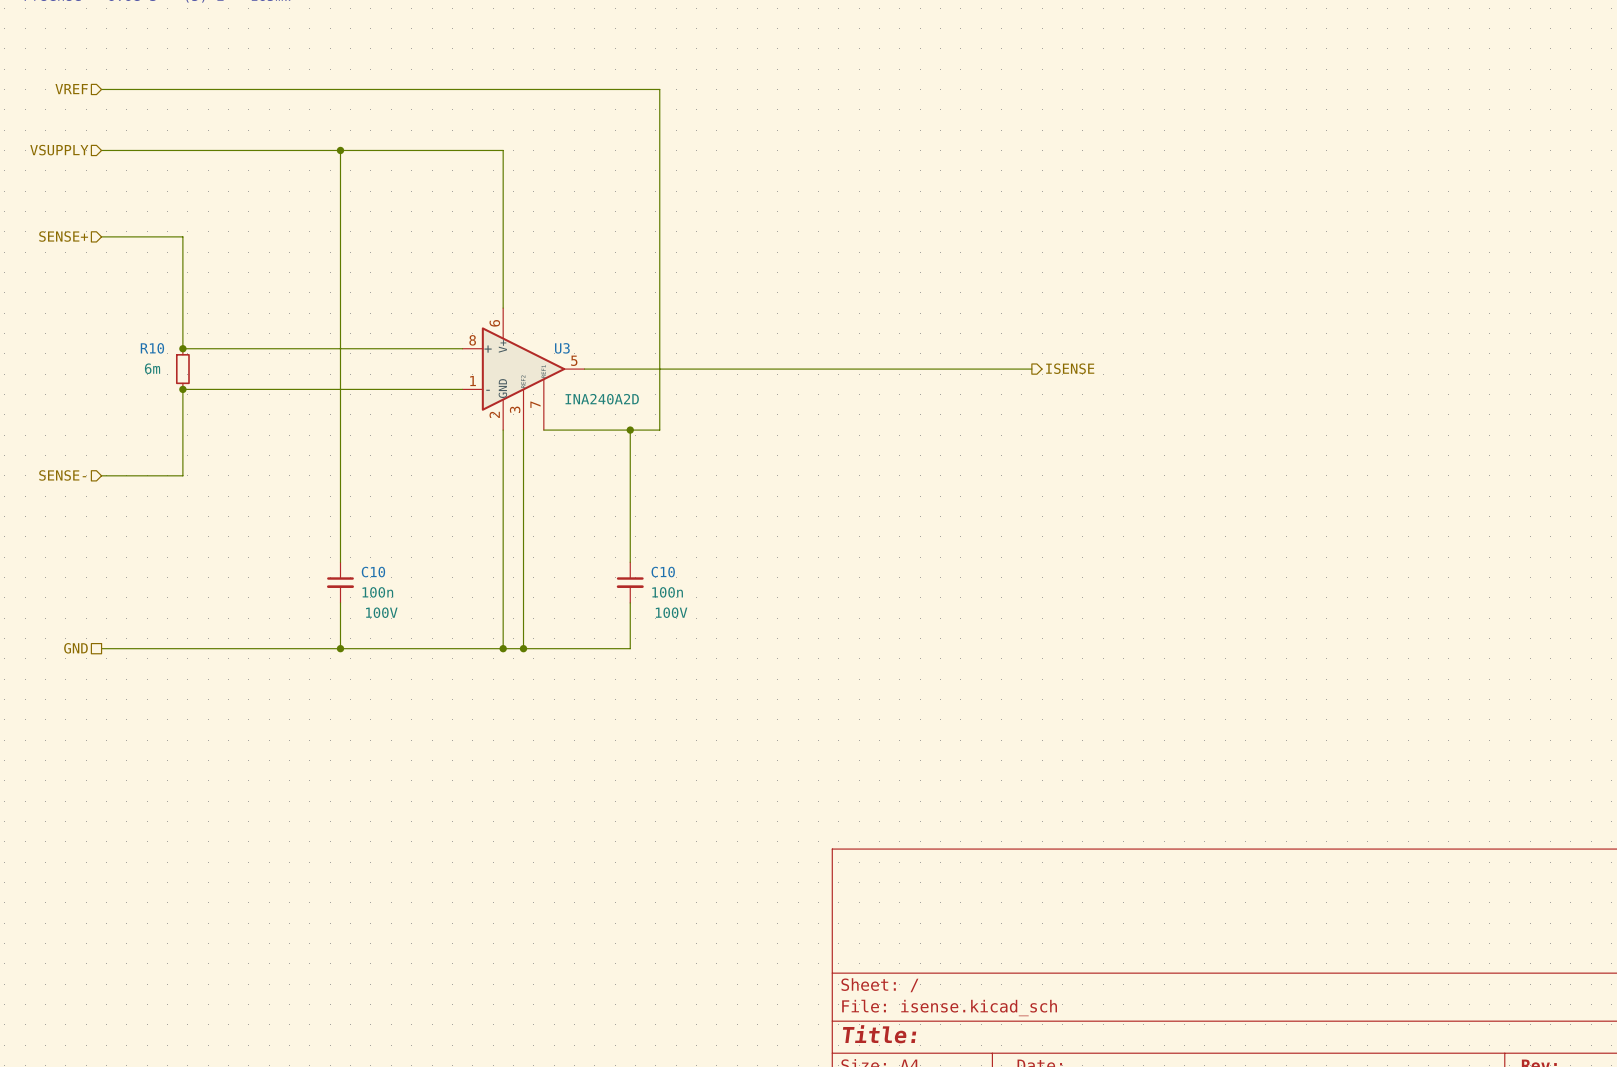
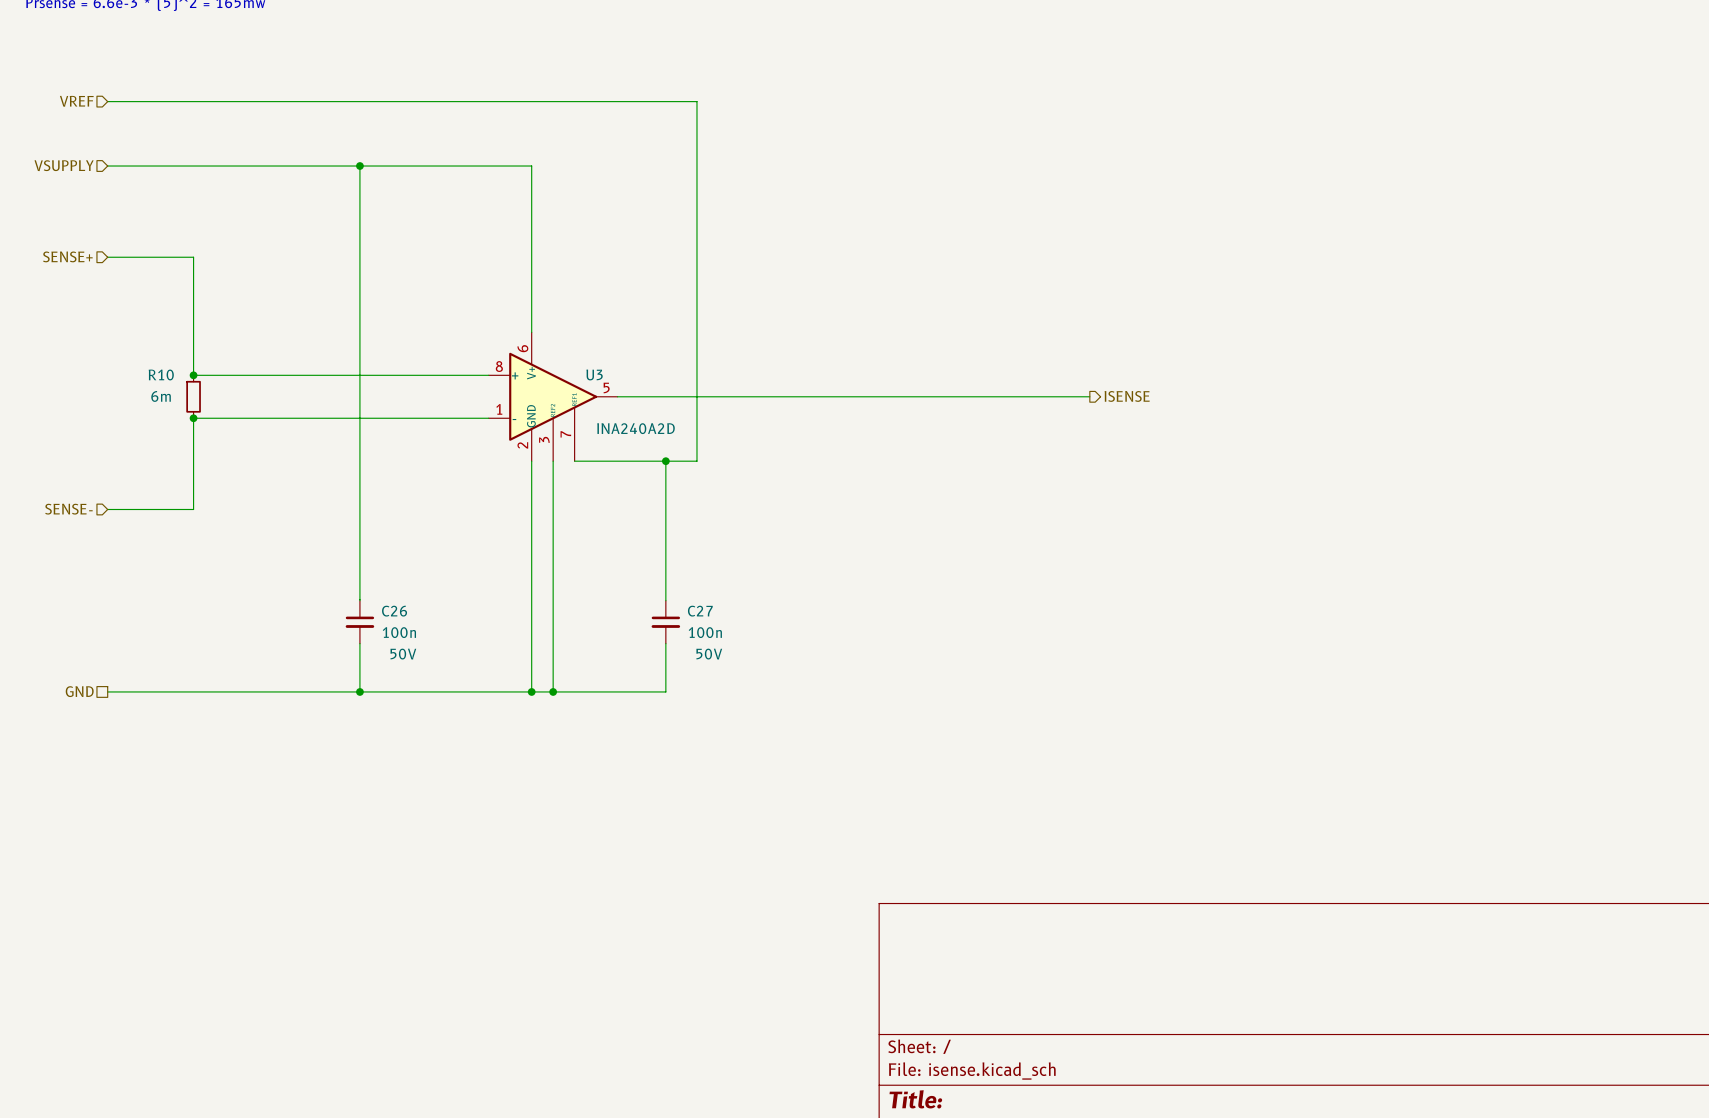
C10 name: C10 (373, 572) -> C26 (394, 611)
C10 name: C10 (663, 572) -> C27 (700, 611)
C10 text: 100V (381, 612) -> 50V (403, 654)
C10 text: 100V (671, 612) -> 50V (709, 654)

